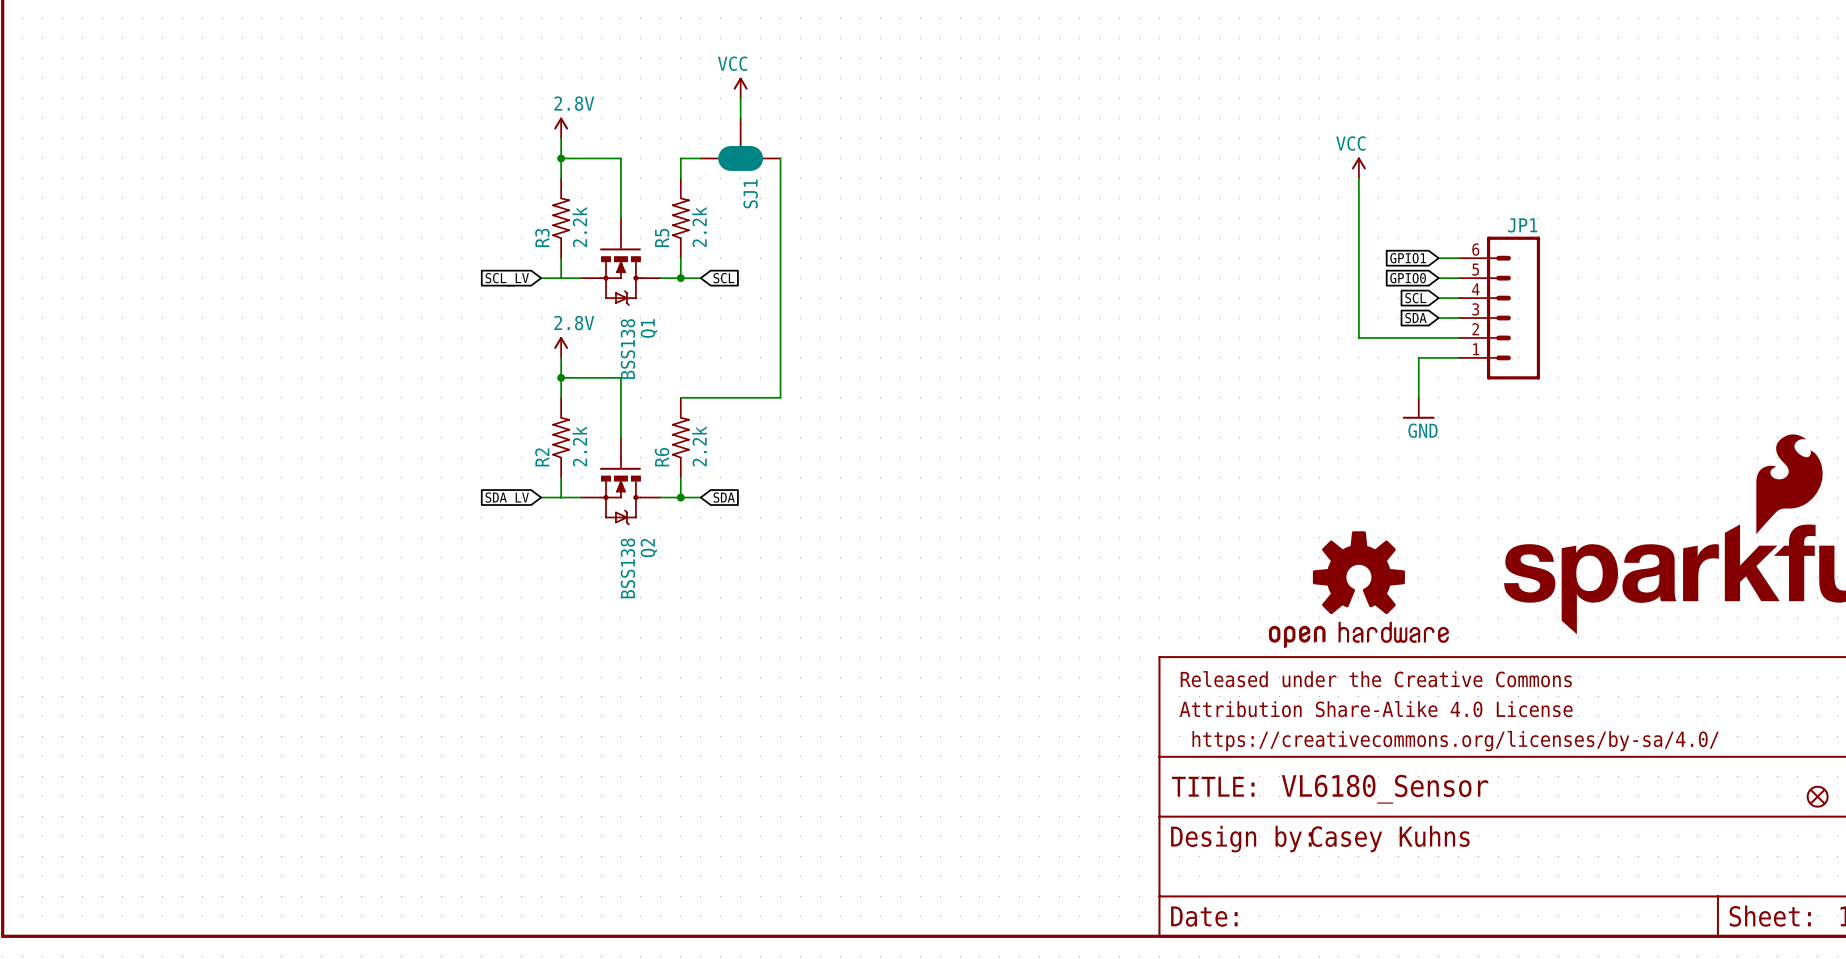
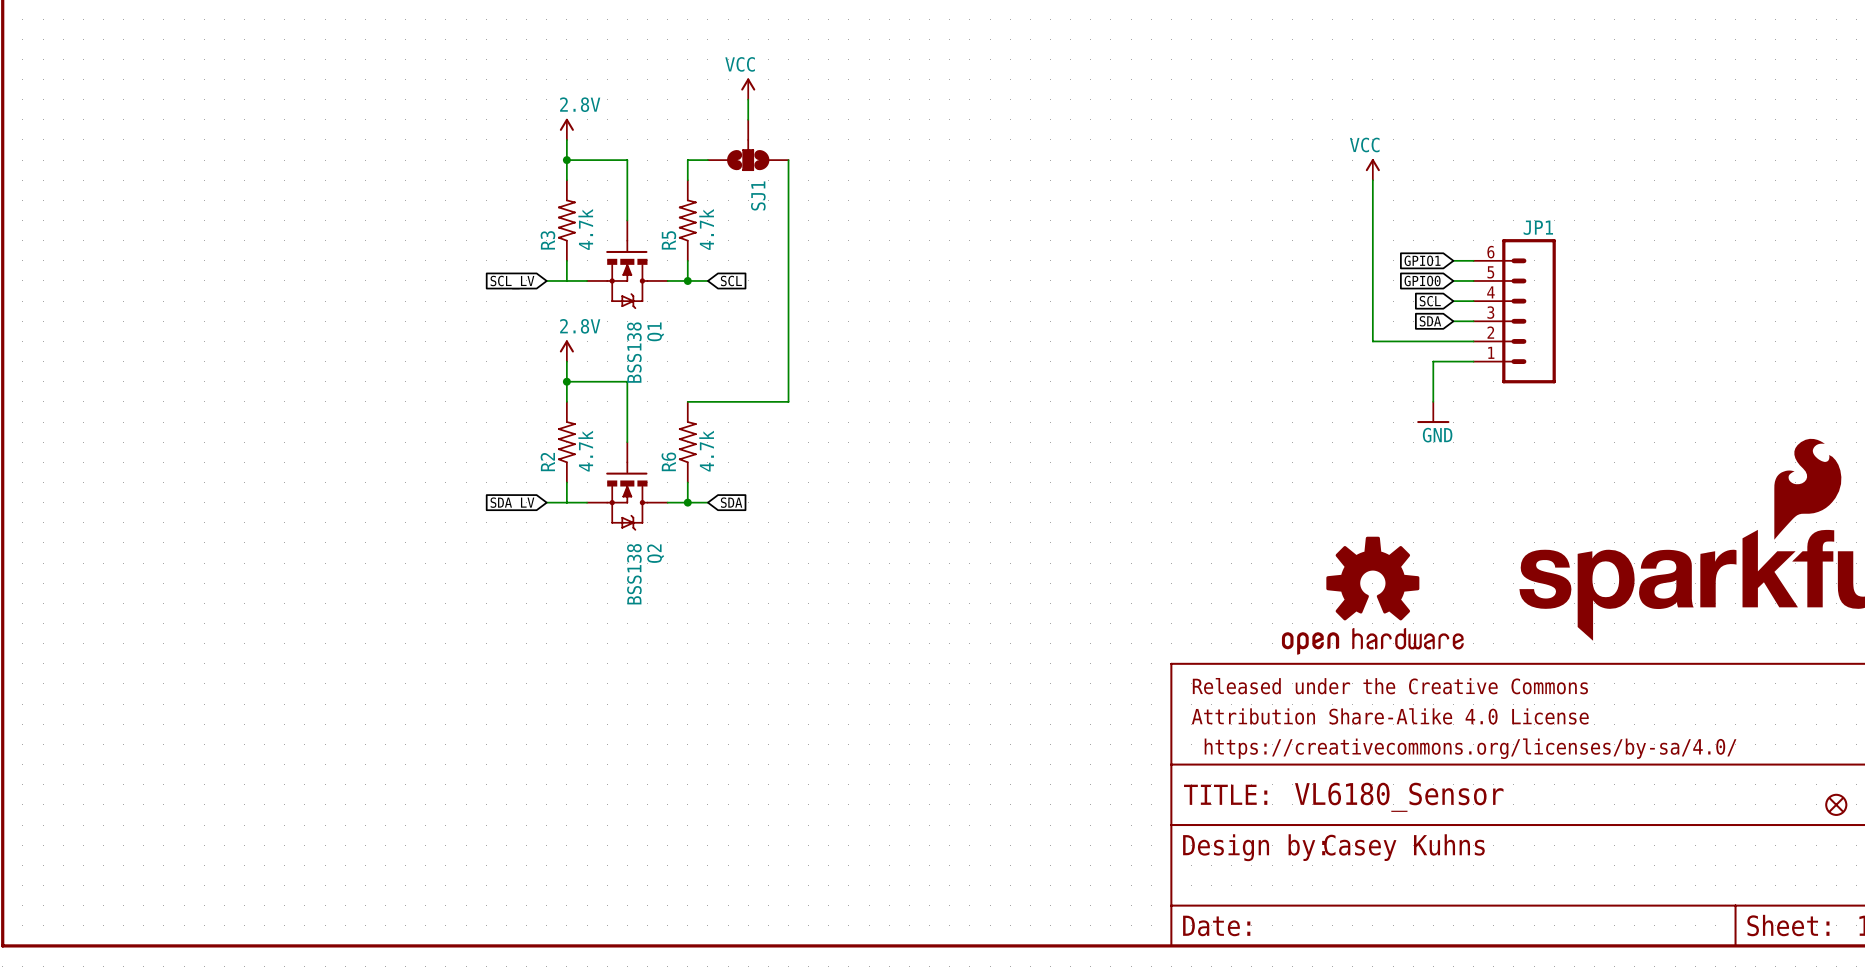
SJ1 symbol: [700, 118, 781, 171] -> [707, 119, 789, 171]
R3 value: 2.2k (579, 226) -> 4.7k (585, 229)
R5 value: 2.2k (699, 226) -> 4.7k (706, 229)
R2 value: 2.2k (579, 446) -> 4.7k (585, 451)
R6 value: 2.2k (699, 446) -> 4.7k (706, 451)

